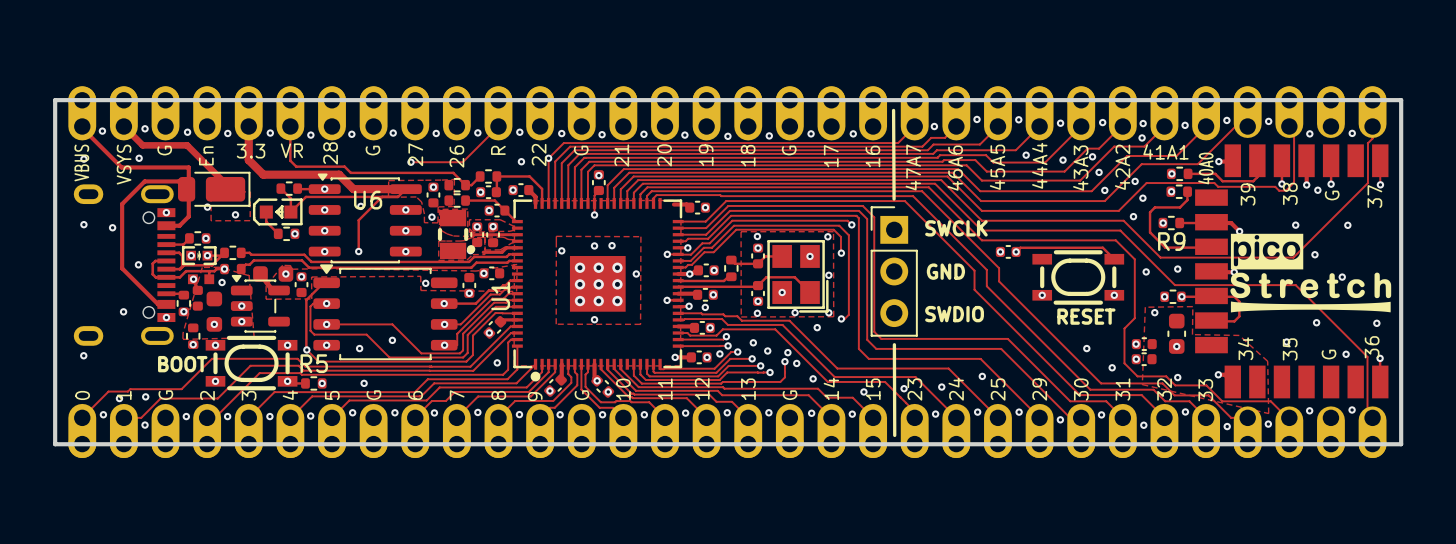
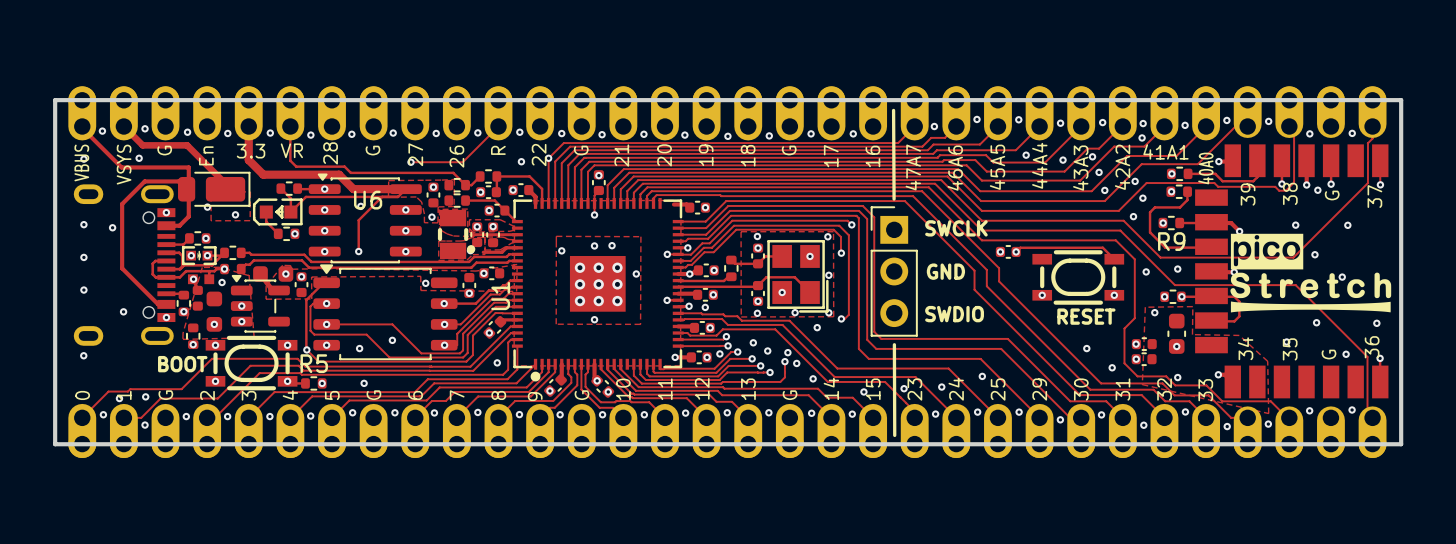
via: none -> (83, 257)
via: (138, 264) -> none
via: none -> (83, 290)

